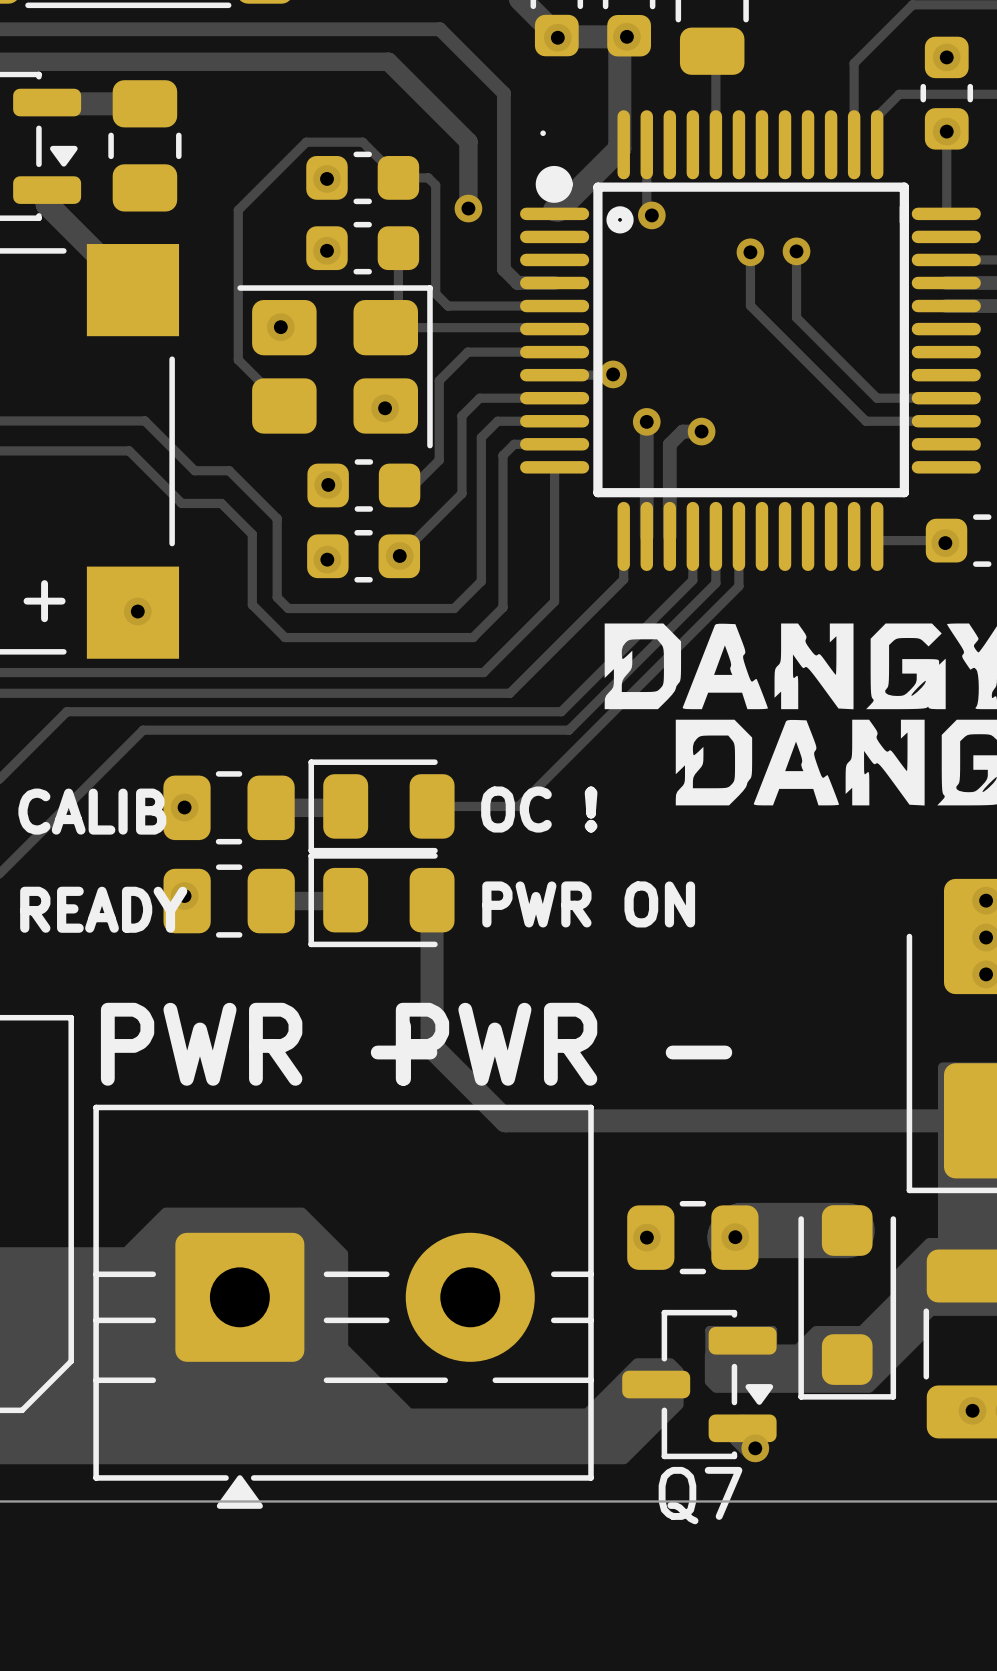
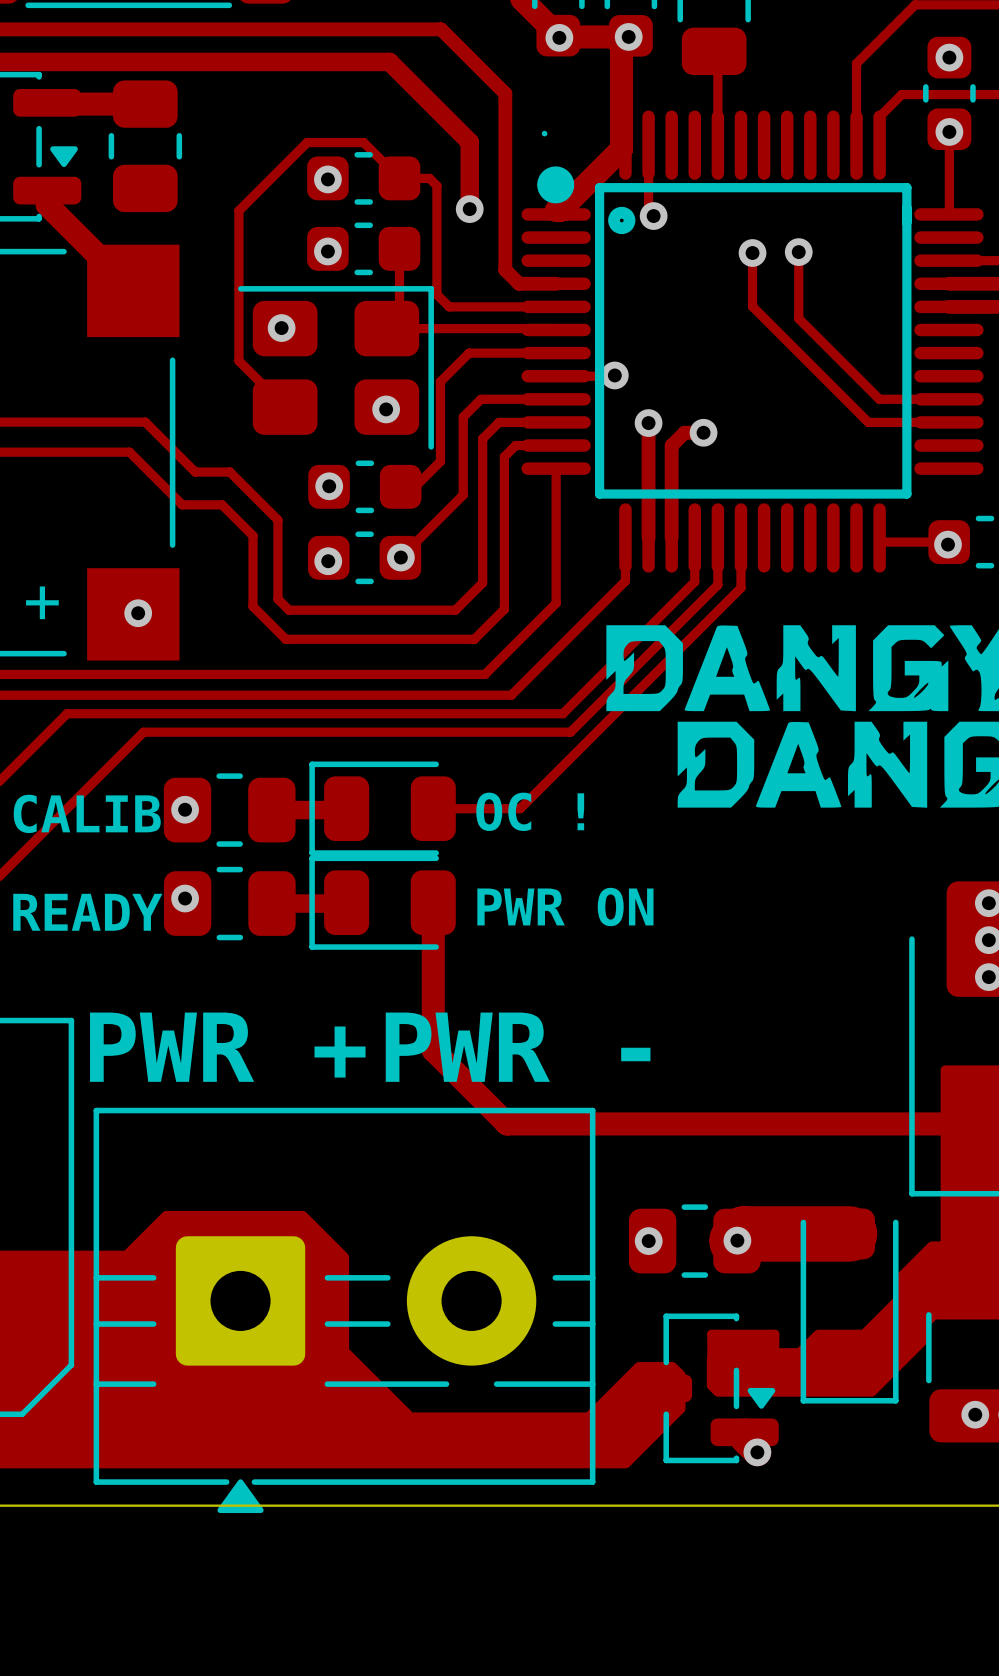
Q7 name: Q7 (700, 1495) -> none

